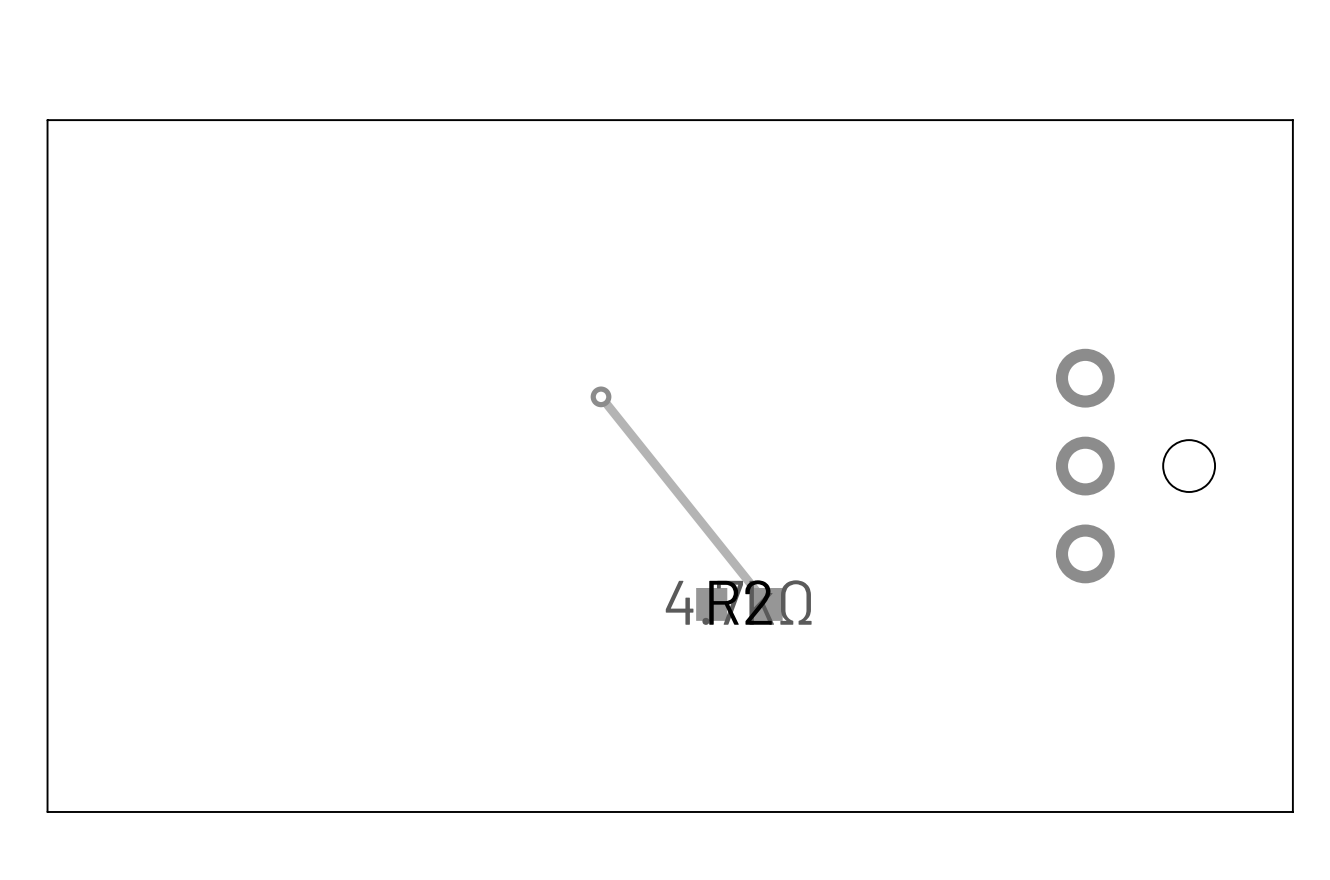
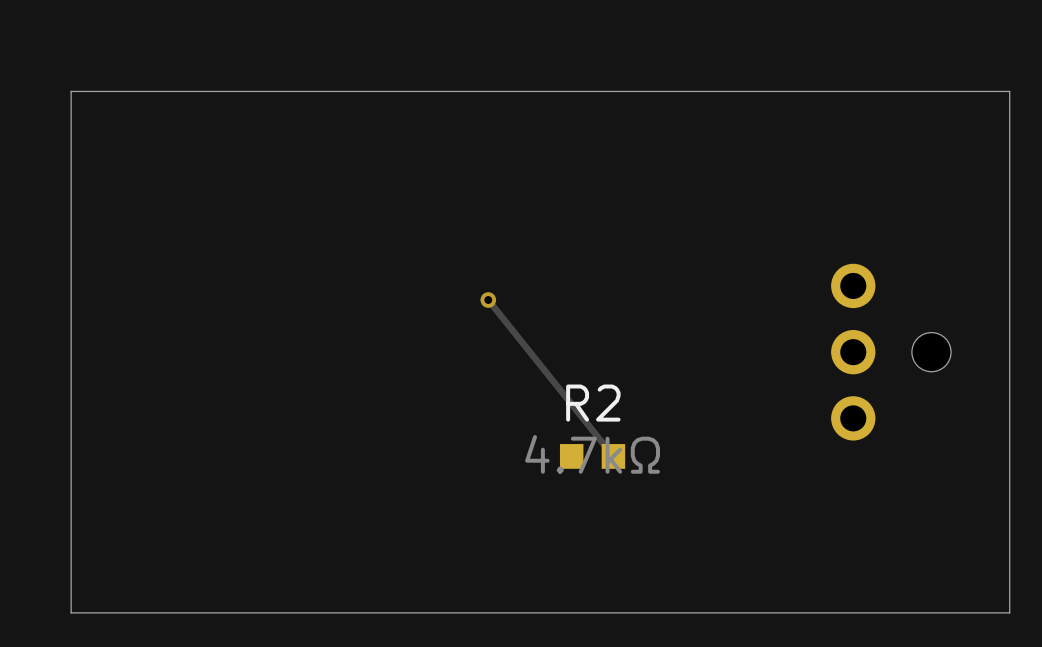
R2 name position: R2 (740, 602) -> R2 (593, 403)

